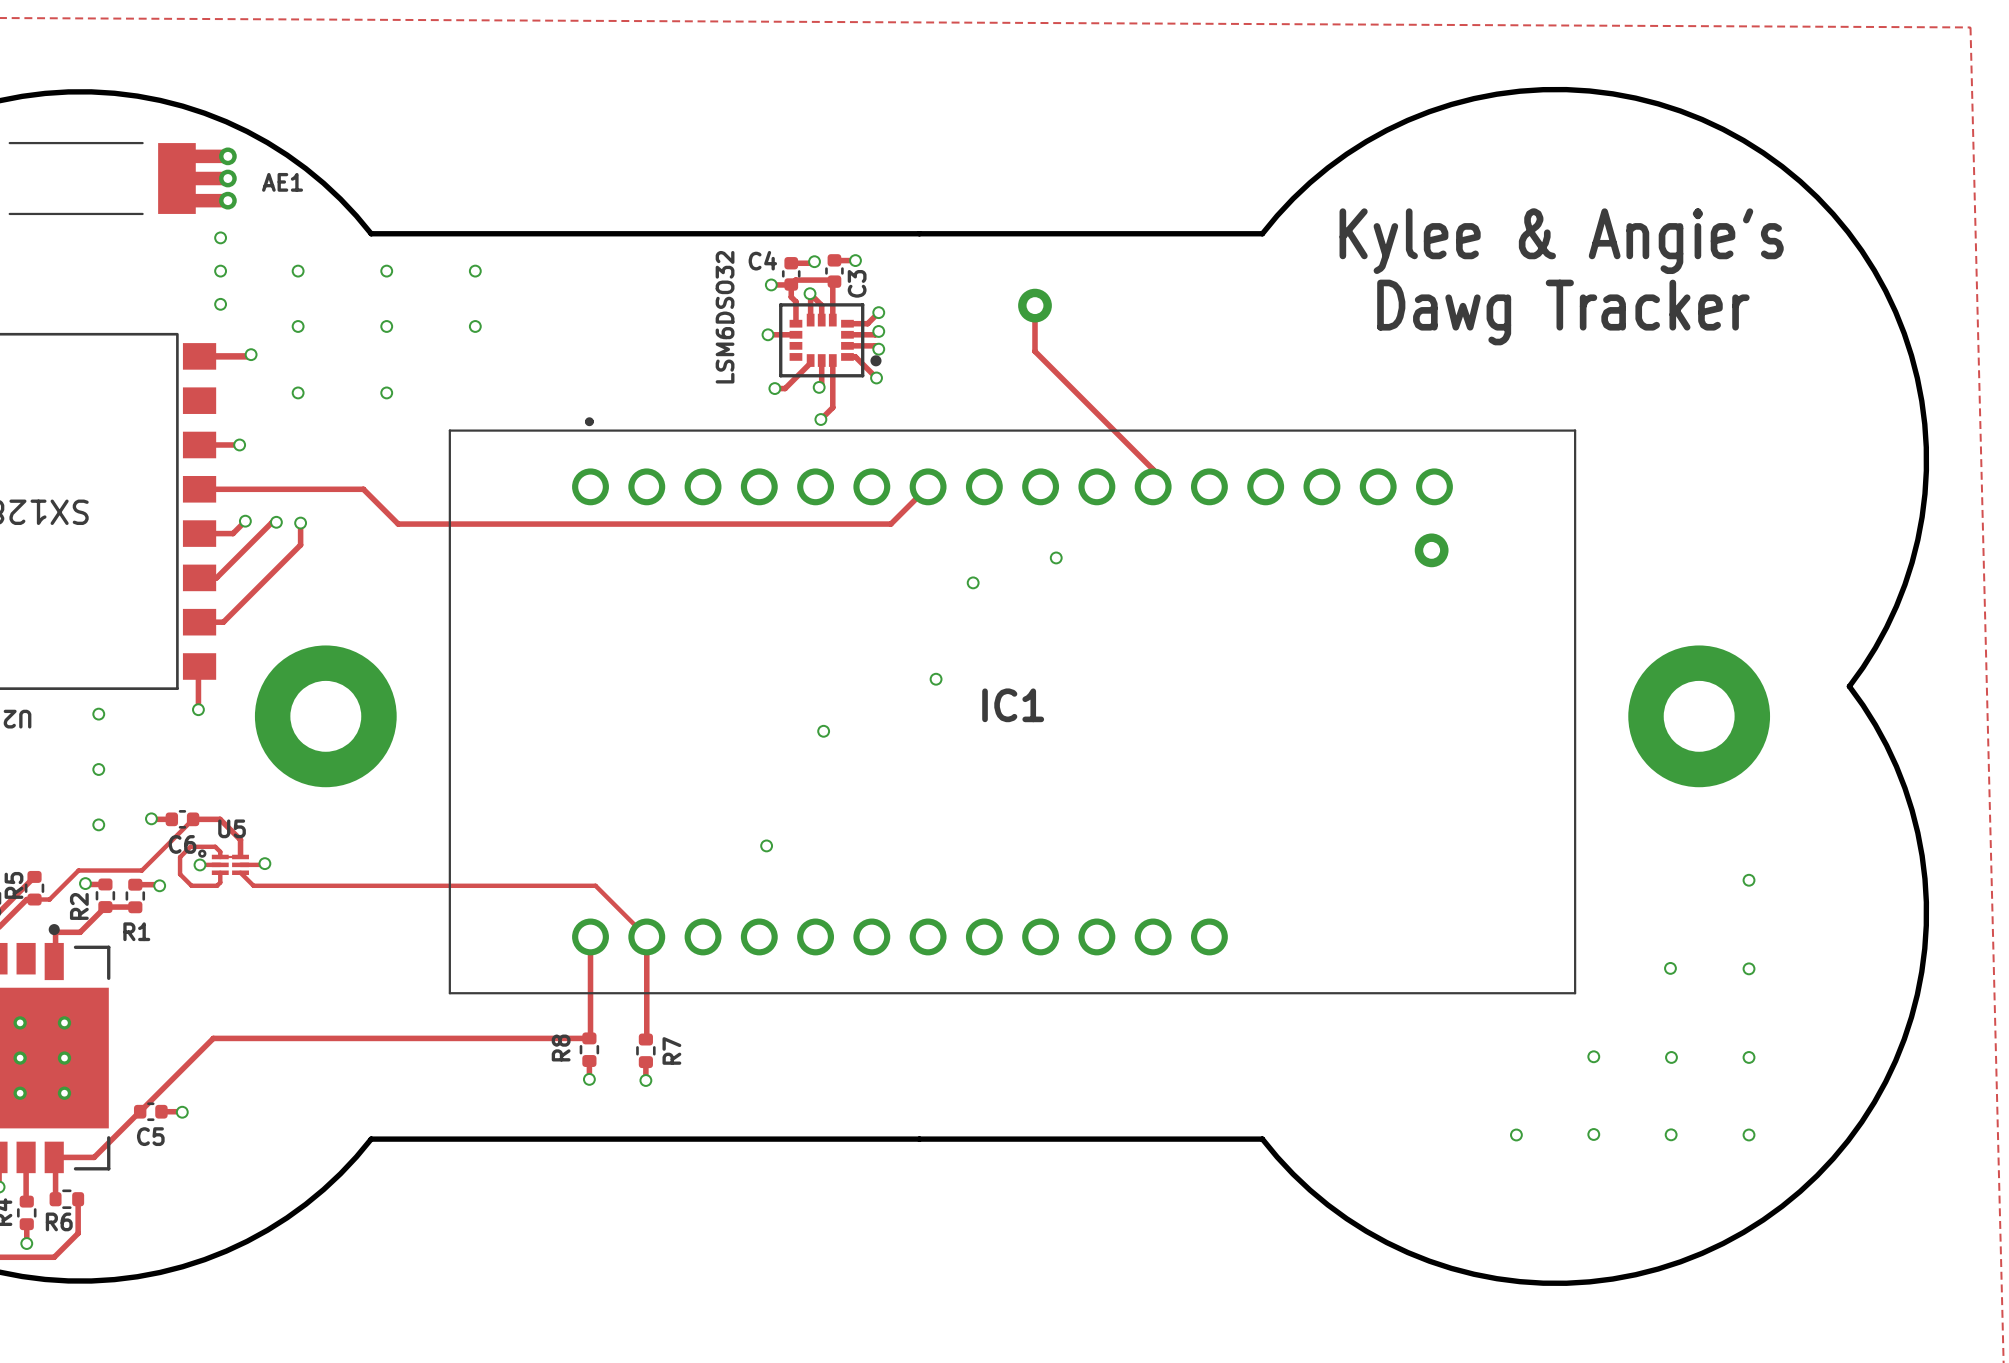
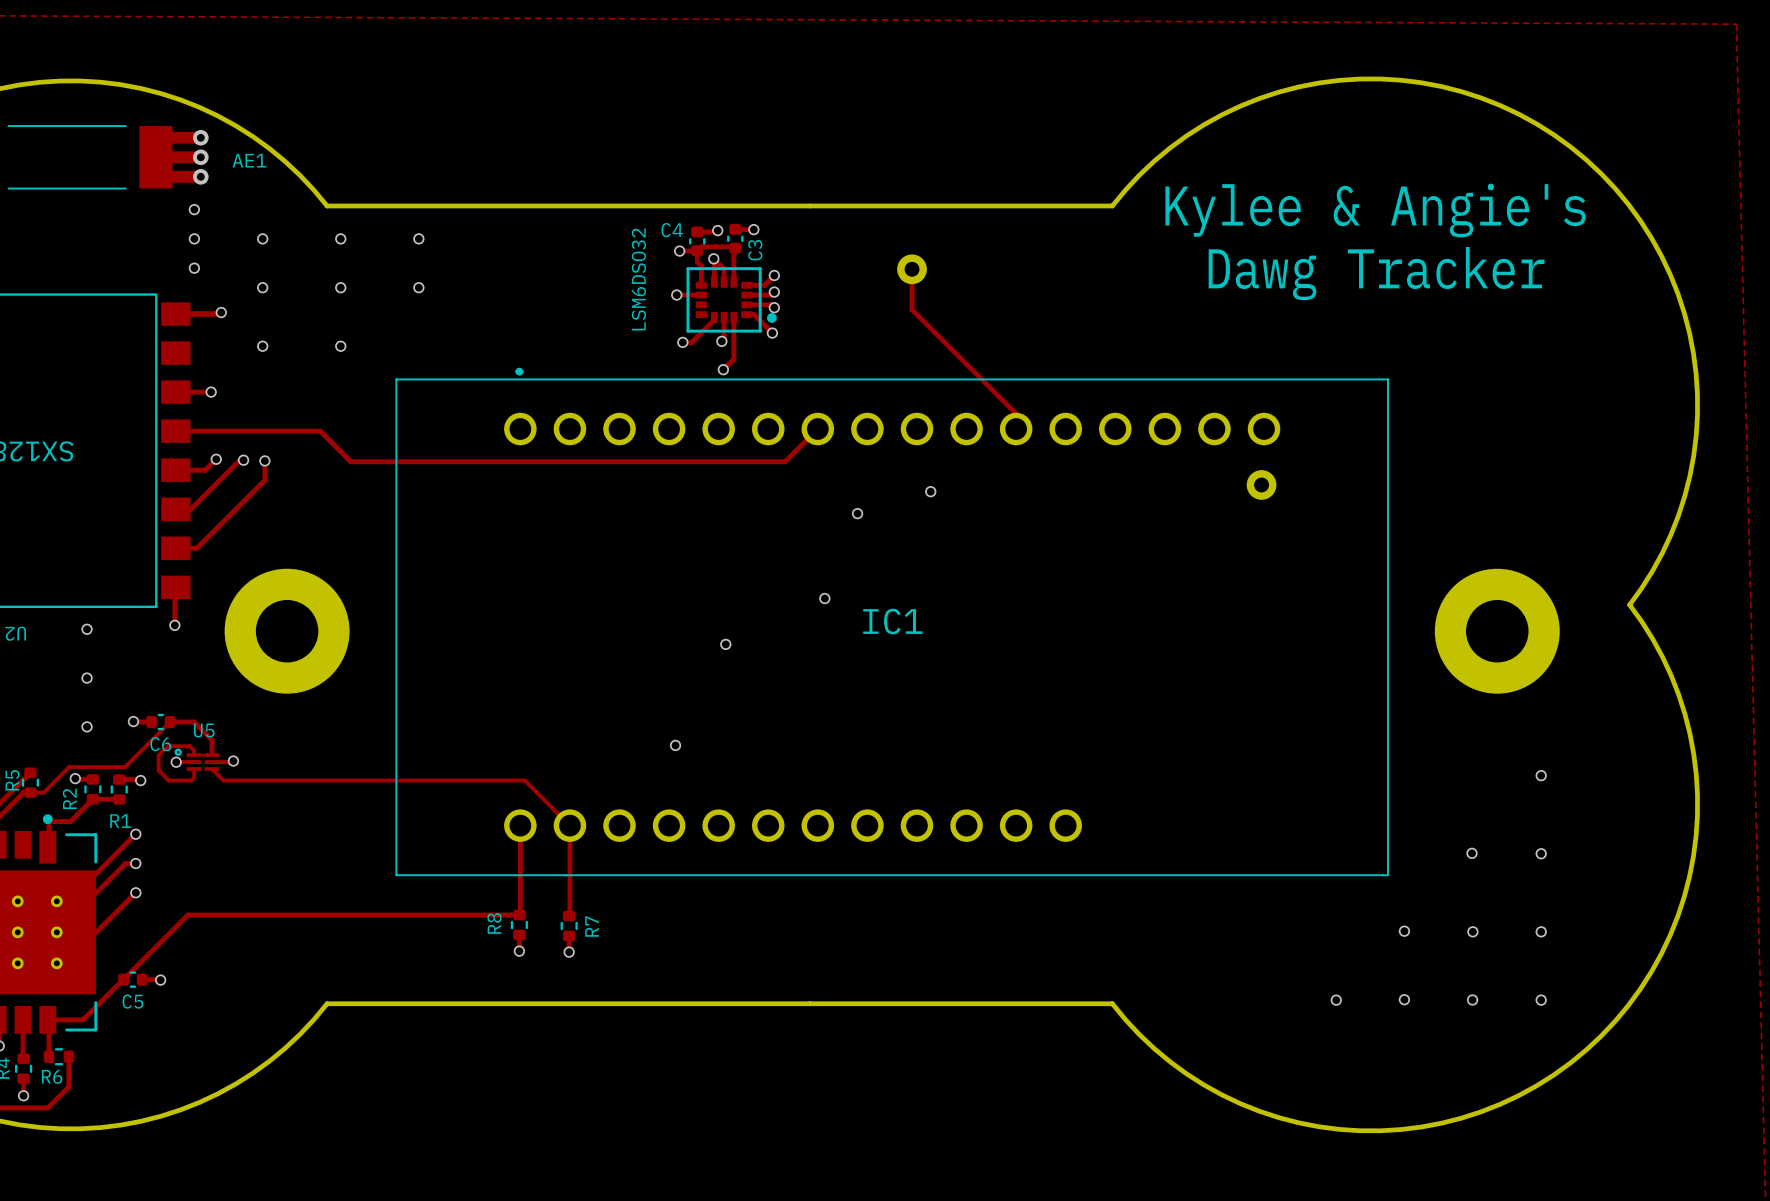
track: none -> (135, 834) (68, 901) (56, 901)
via: none -> (135, 834)
track: none -> (135, 863) (125, 863) (56, 932)
via: none -> (135, 863)
track: none -> (135, 892) (65, 963) (56, 963)
via: none -> (135, 892)

